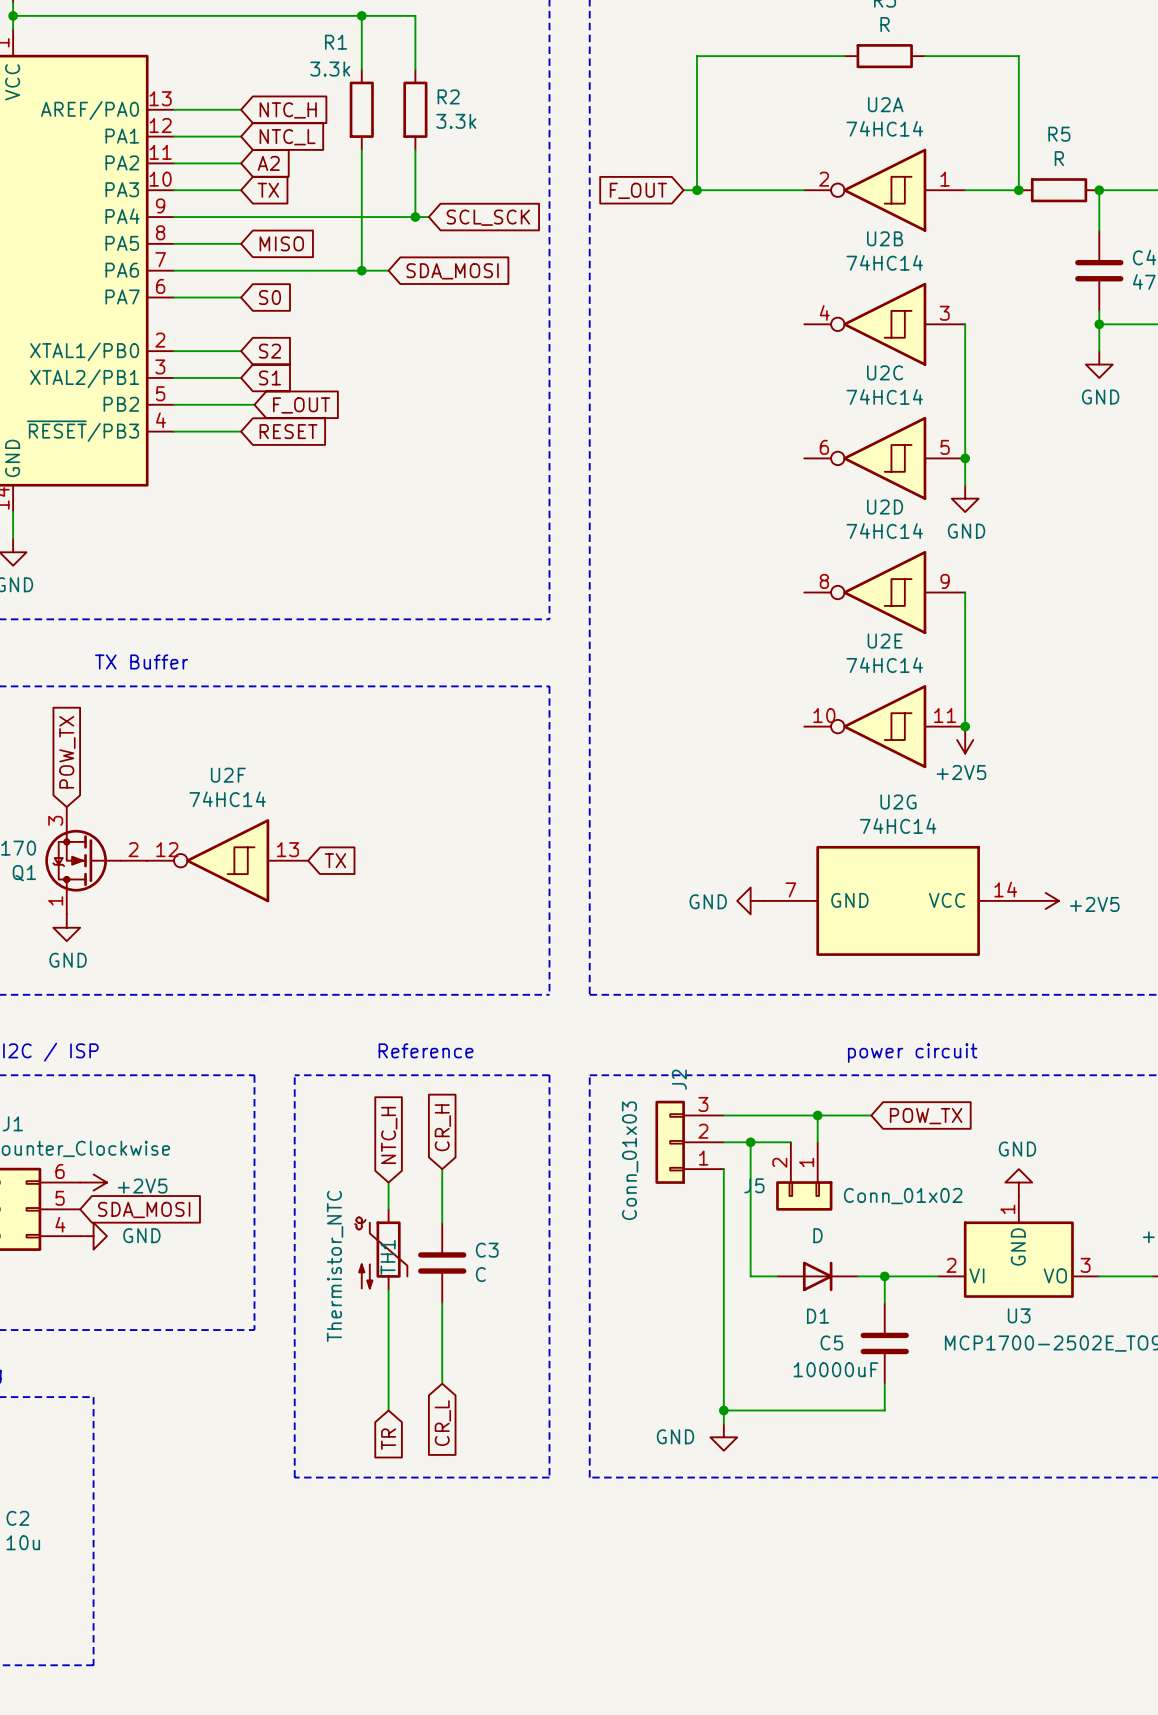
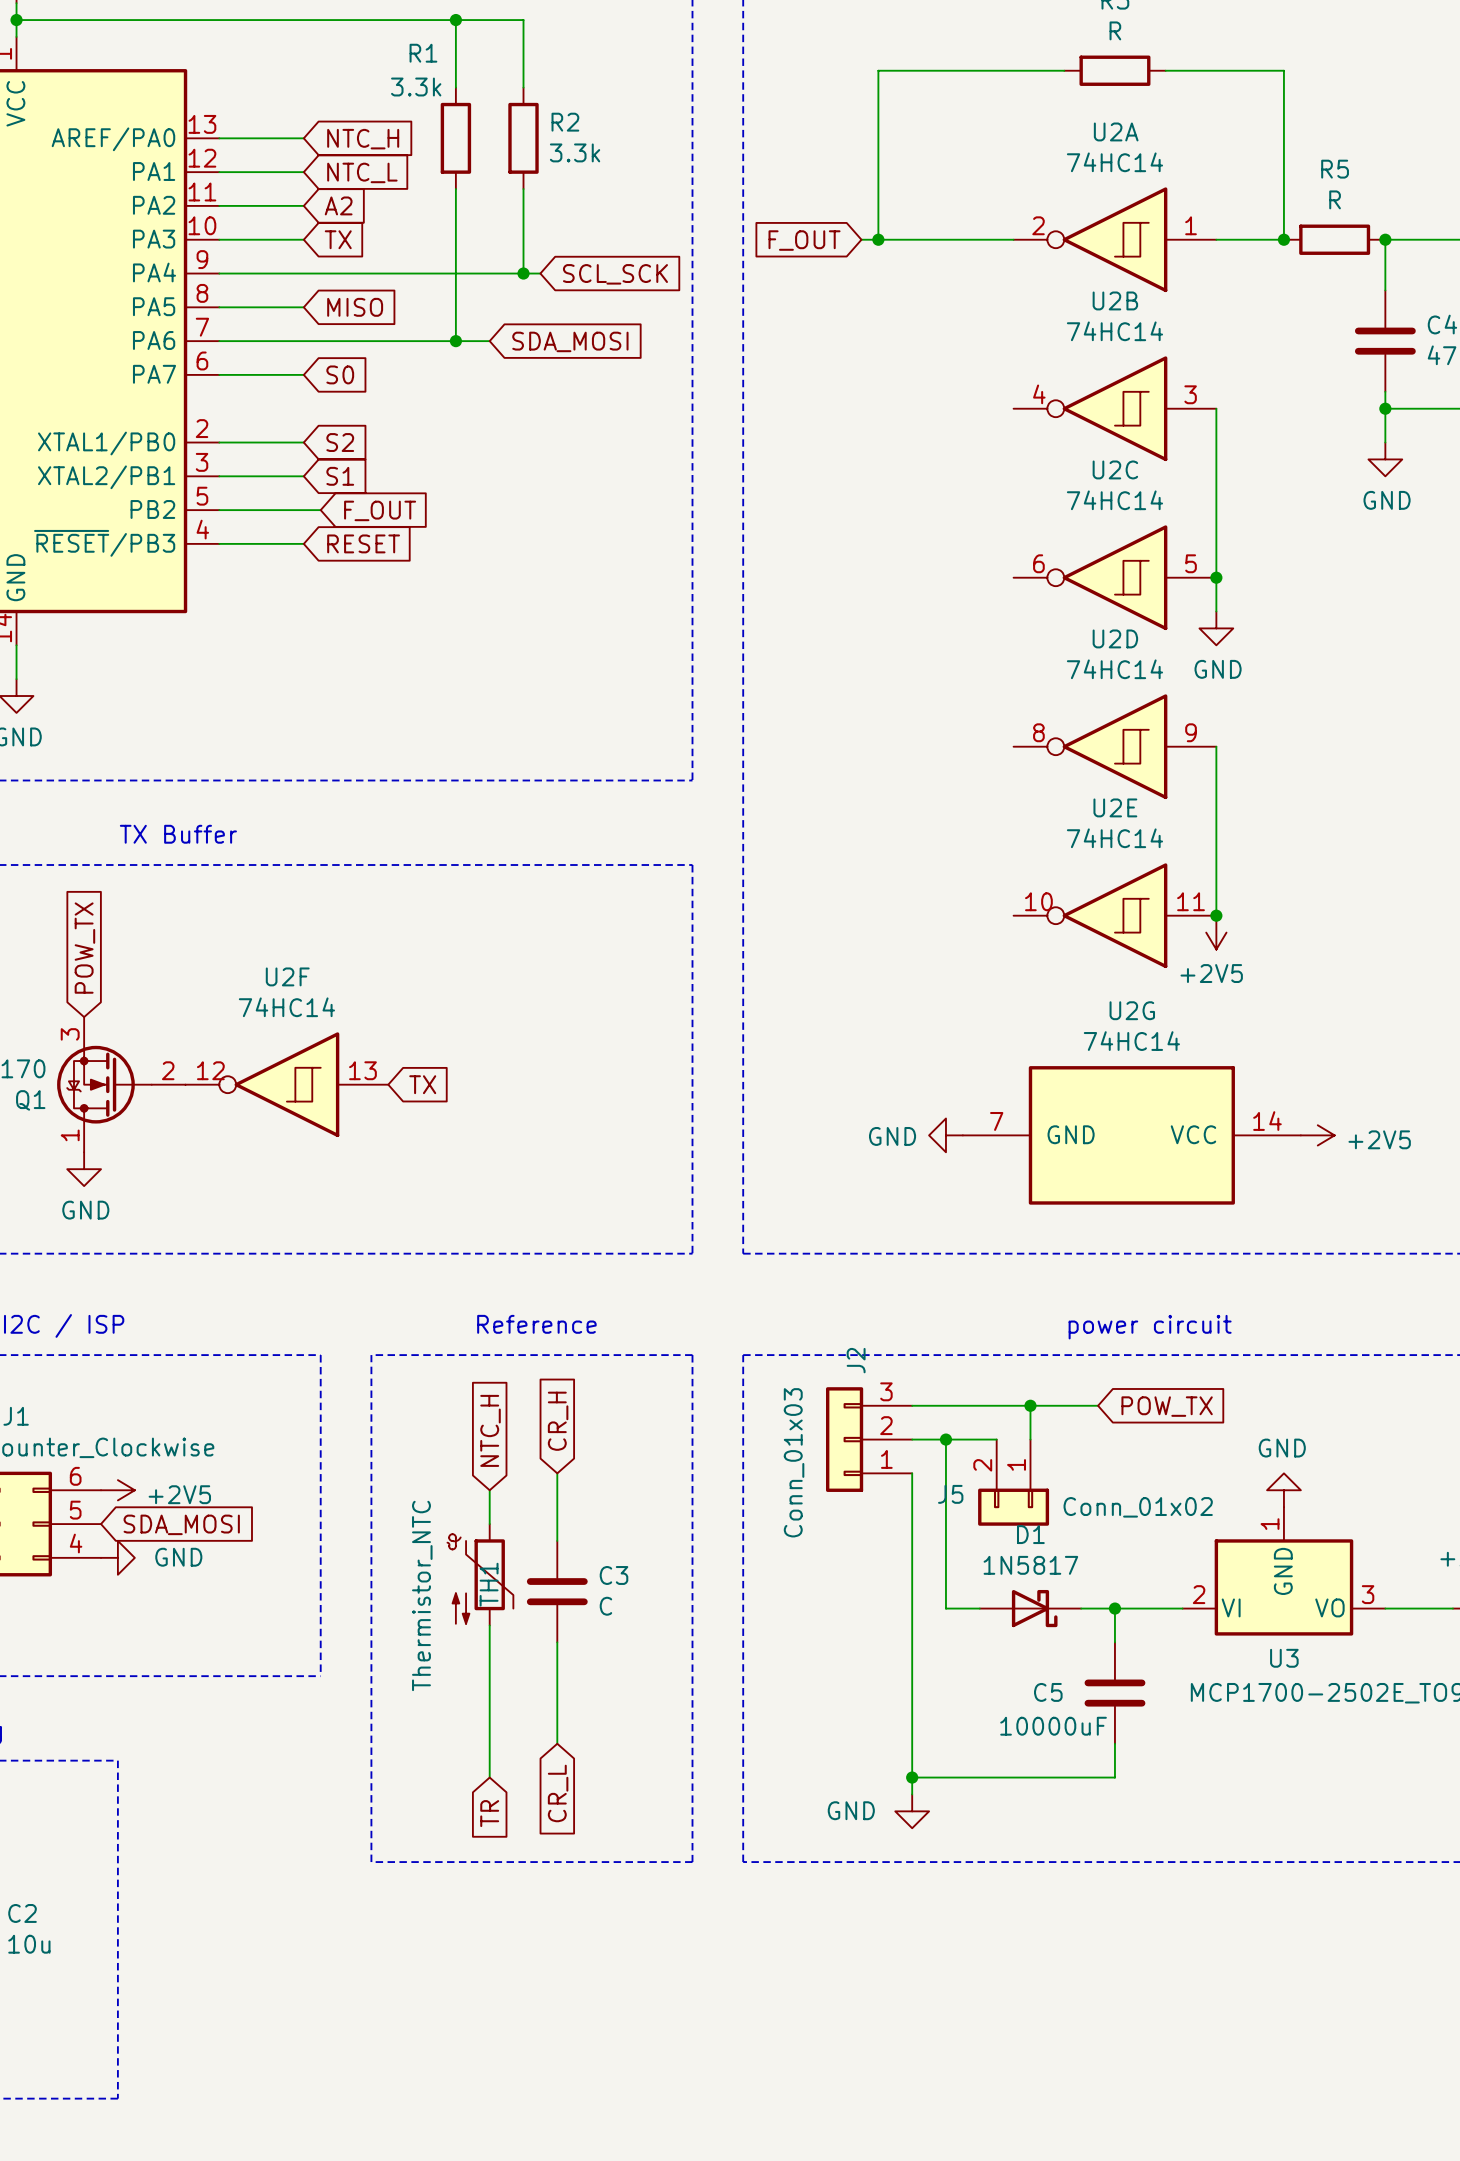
D1 value: D (818, 1235) -> 1N5817 (1030, 1565)
D1 symbol: [777, 1261, 858, 1292] -> [979, 1589, 1082, 1628]
D1 name position: D1 (818, 1316) -> D1 (1030, 1534)

